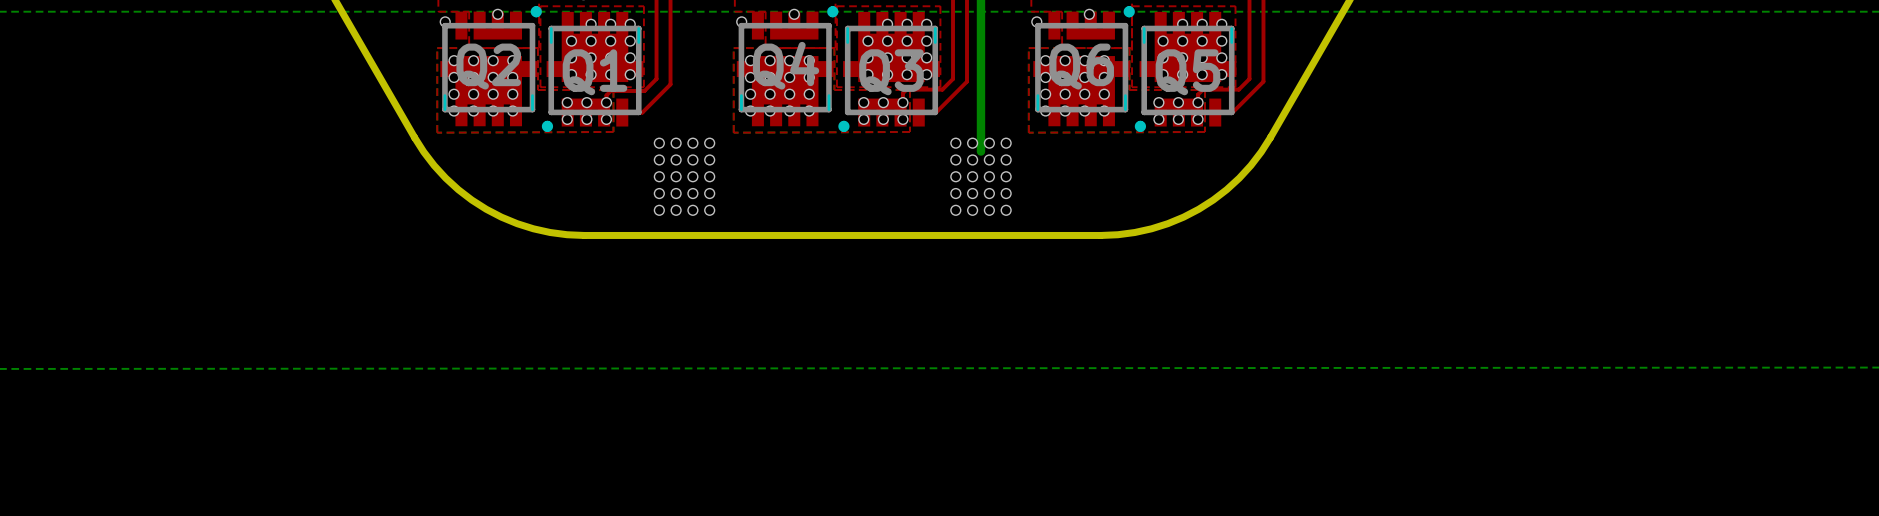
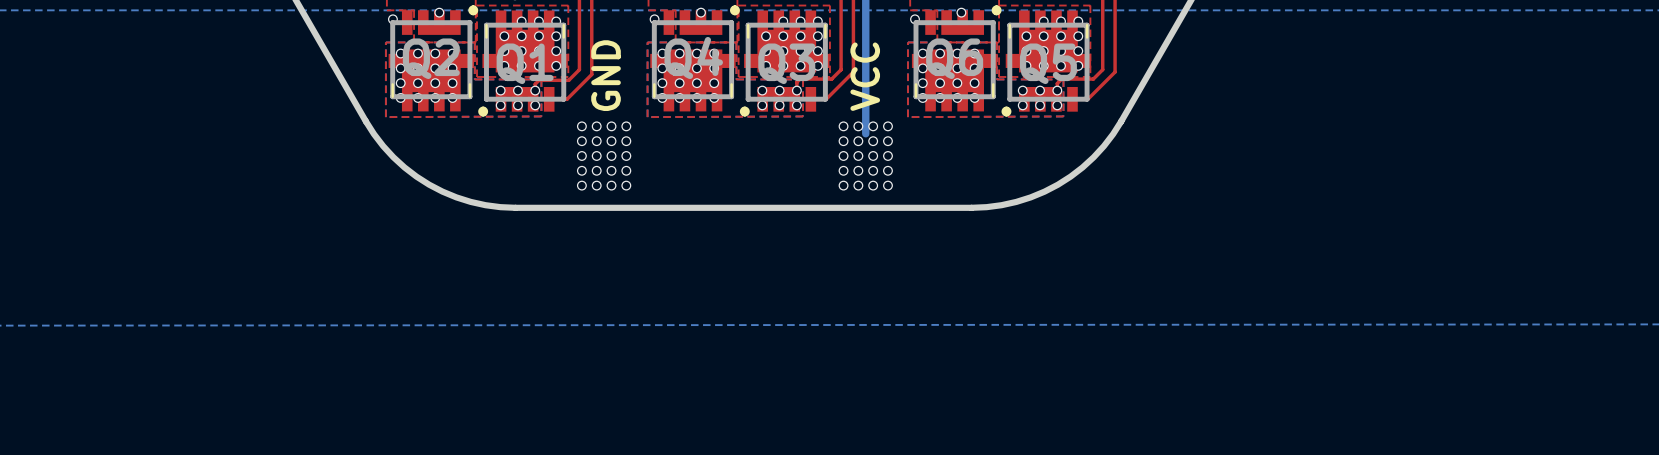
text: none -> GND (606, 75)
text: none -> VCC (865, 76)

